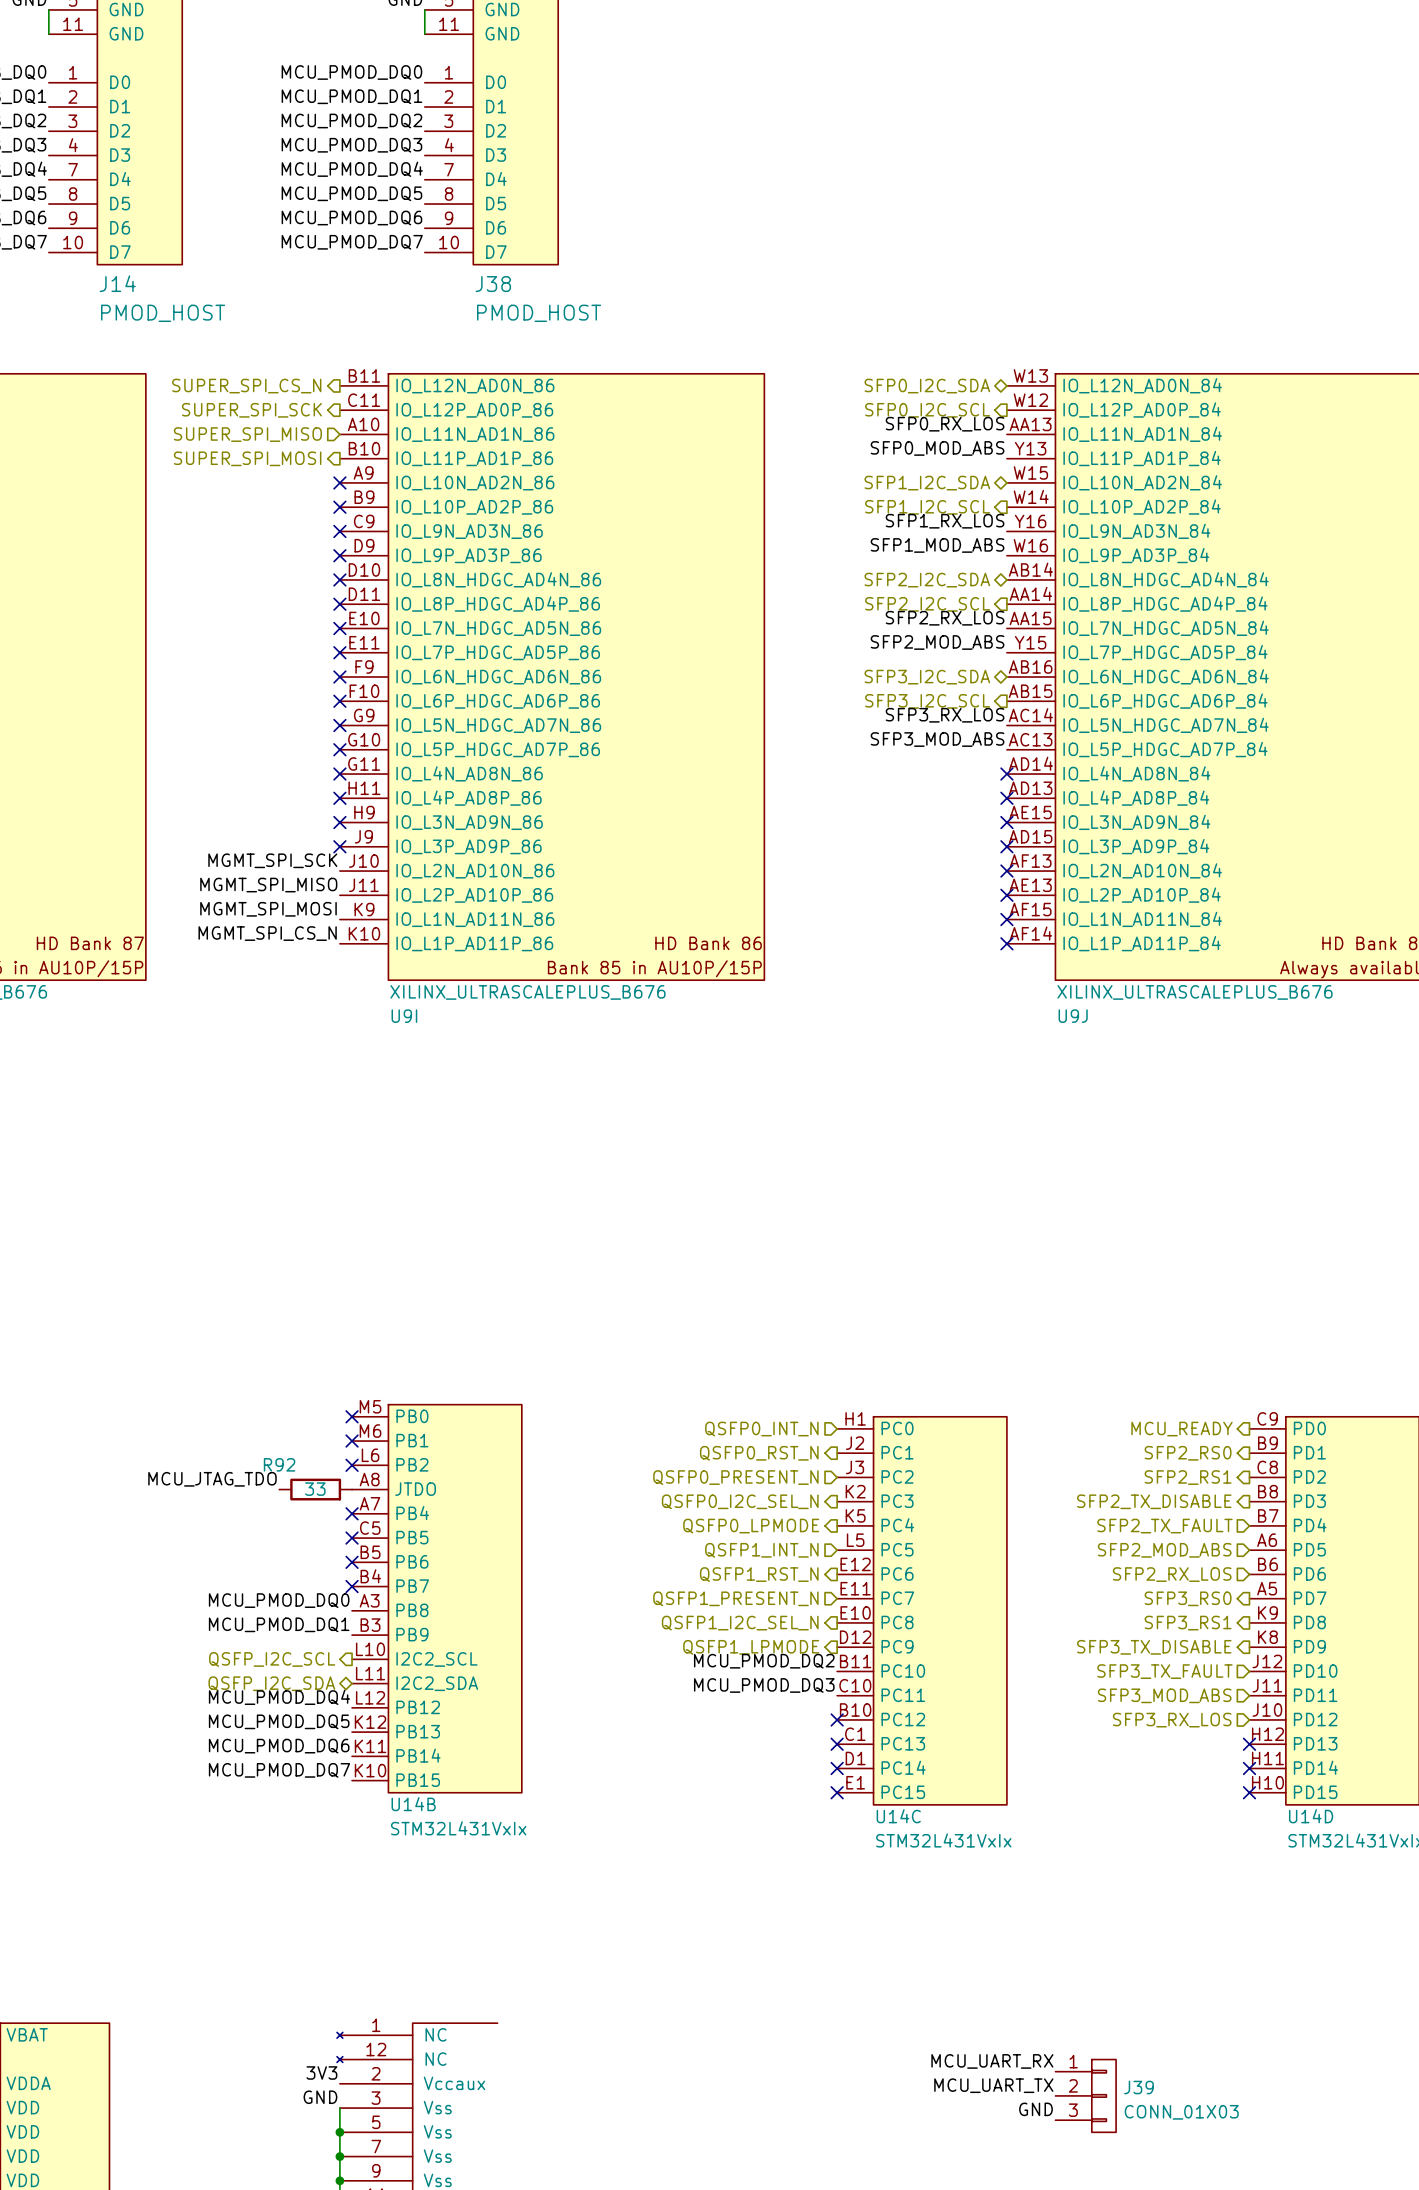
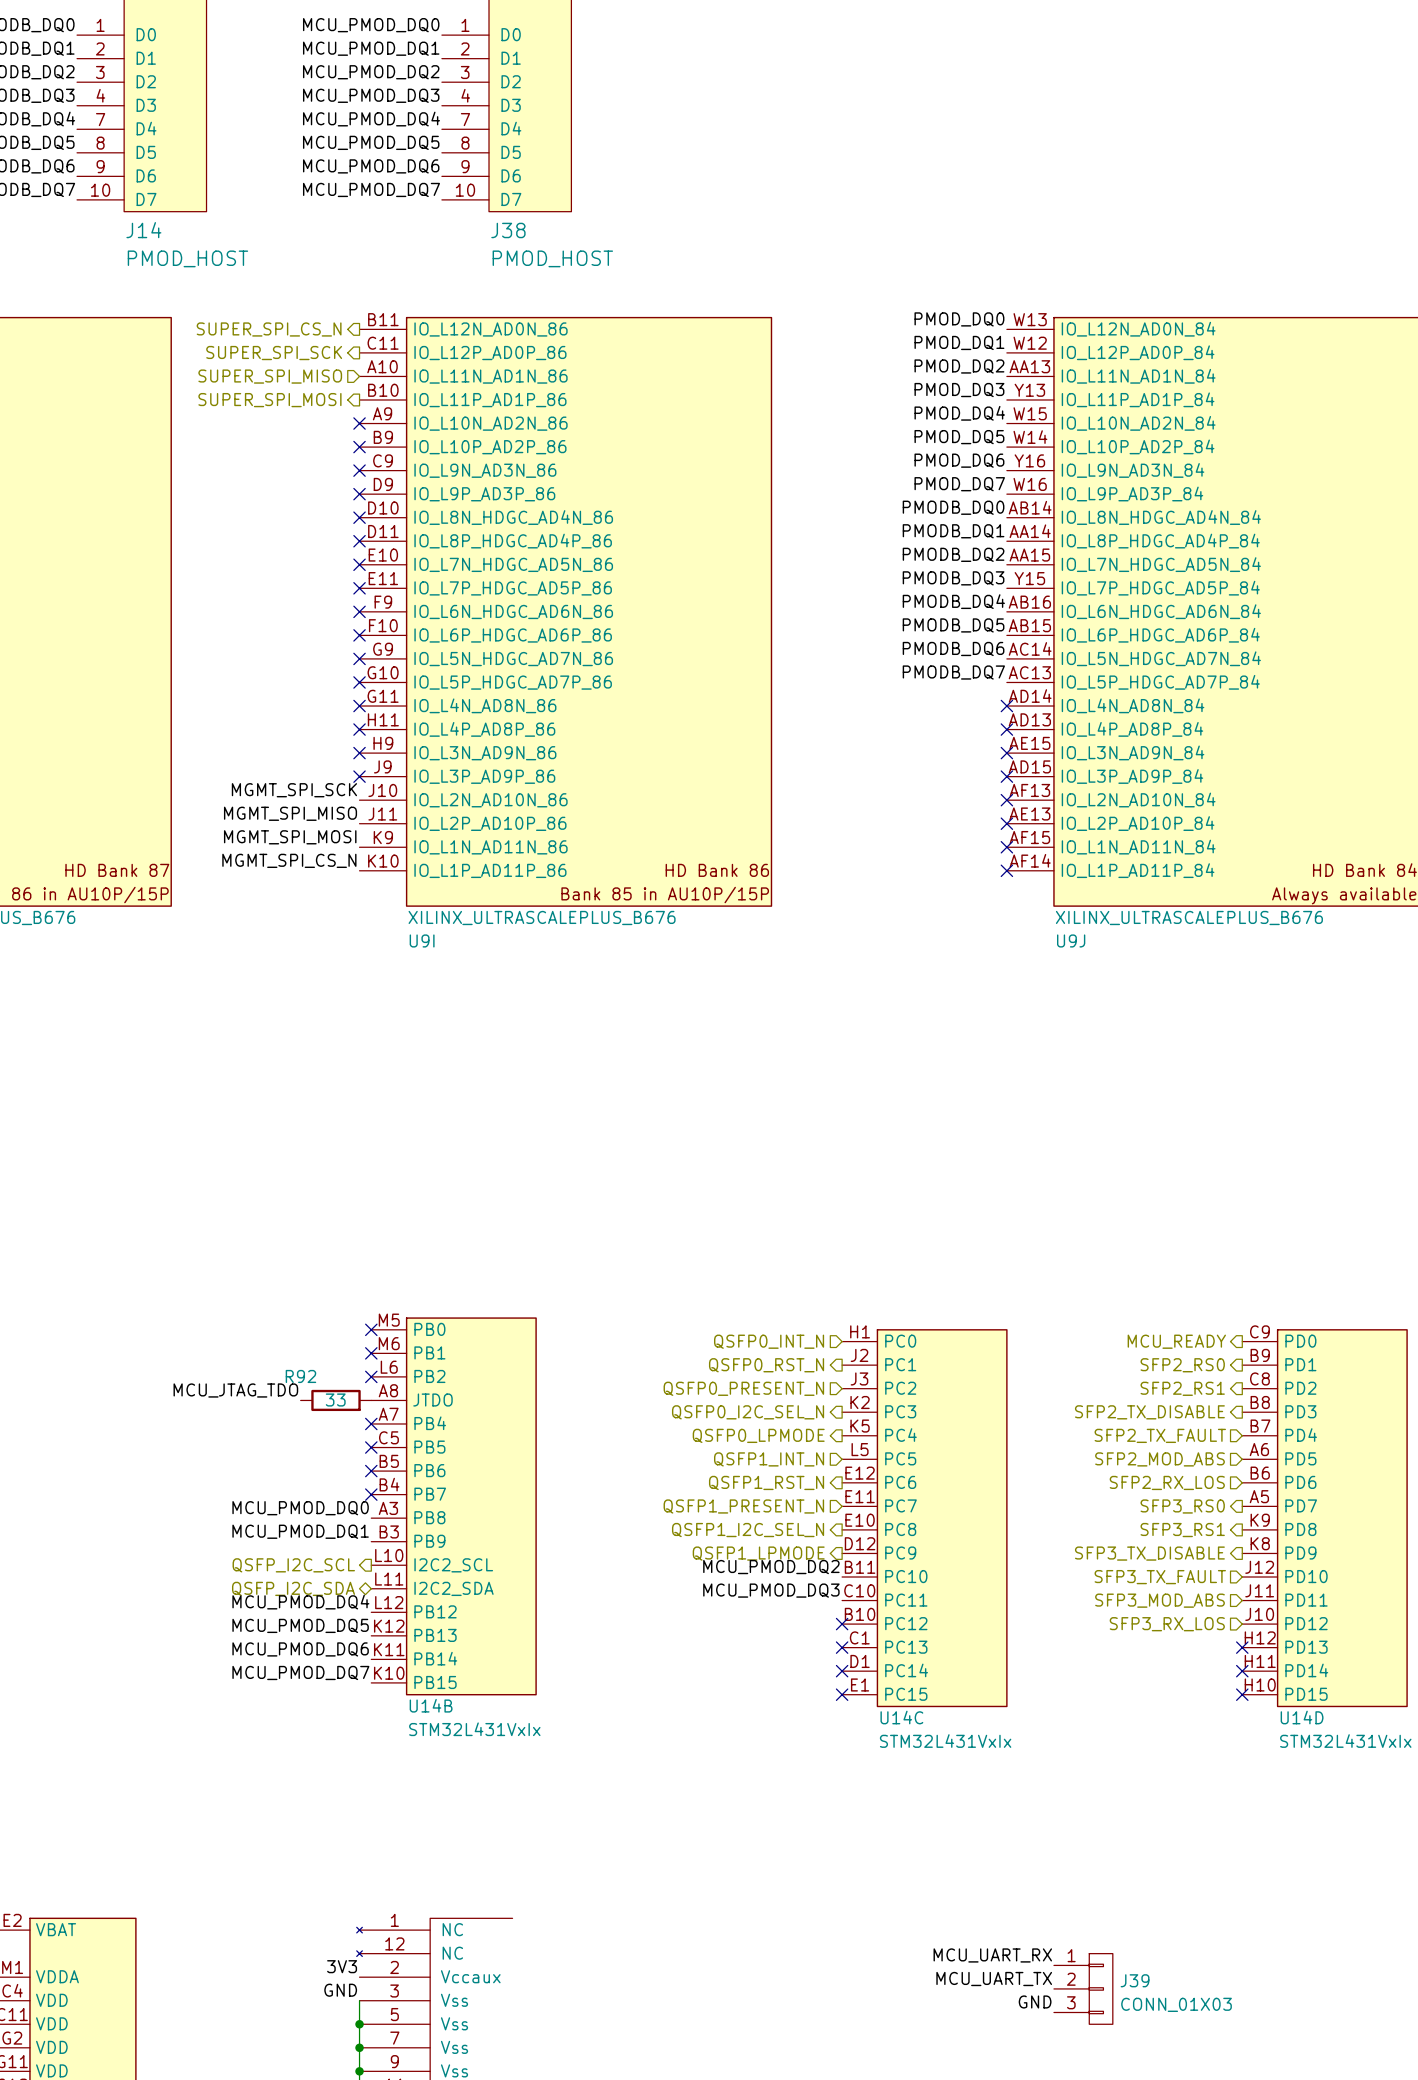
label: none -> PMOD_DQ0 (959, 319)
hierarchical label: SFP0_I2C_SDA (927, 386) -> none
label: none -> PMOD_DQ1 (959, 342)
hierarchical label: SFP0_I2C_SCL (927, 410) -> none
label: SFP0_RX_LOS (945, 424) -> PMOD_DQ2 (959, 366)
label: SFP0_MOD_ABS (937, 448) -> PMOD_DQ3 (959, 390)
label: none -> PMOD_DQ4 (959, 413)
hierarchical label: SFP1_I2C_SDA (927, 483) -> none
label: none -> PMOD_DQ5 (959, 437)
hierarchical label: SFP1_I2C_SCL (927, 507) -> none
label: SFP1_RX_LOS (945, 521) -> PMOD_DQ6 (959, 460)
label: SFP1_MOD_ABS (937, 545) -> PMOD_DQ7 (959, 484)
label: none -> PMODB_DQ0 (953, 507)
hierarchical label: SFP2_I2C_SDA (927, 580) -> none
label: none -> PMODB_DQ1 (953, 531)
hierarchical label: SFP2_I2C_SCL (927, 604) -> none
label: SFP2_RX_LOS (945, 618) -> PMODB_DQ2 (953, 554)
label: SFP2_MOD_ABS (937, 642) -> PMODB_DQ3 (953, 578)
label: none -> PMODB_DQ4 (953, 601)
hierarchical label: SFP3_I2C_SDA (927, 677) -> none
label: none -> PMODB_DQ5 (953, 625)
hierarchical label: SFP3_I2C_SCL (927, 701) -> none
label: SFP3_RX_LOS (945, 715) -> PMODB_DQ6 (953, 648)
label: SFP3_MOD_ABS (937, 739) -> PMODB_DQ7 (953, 672)

